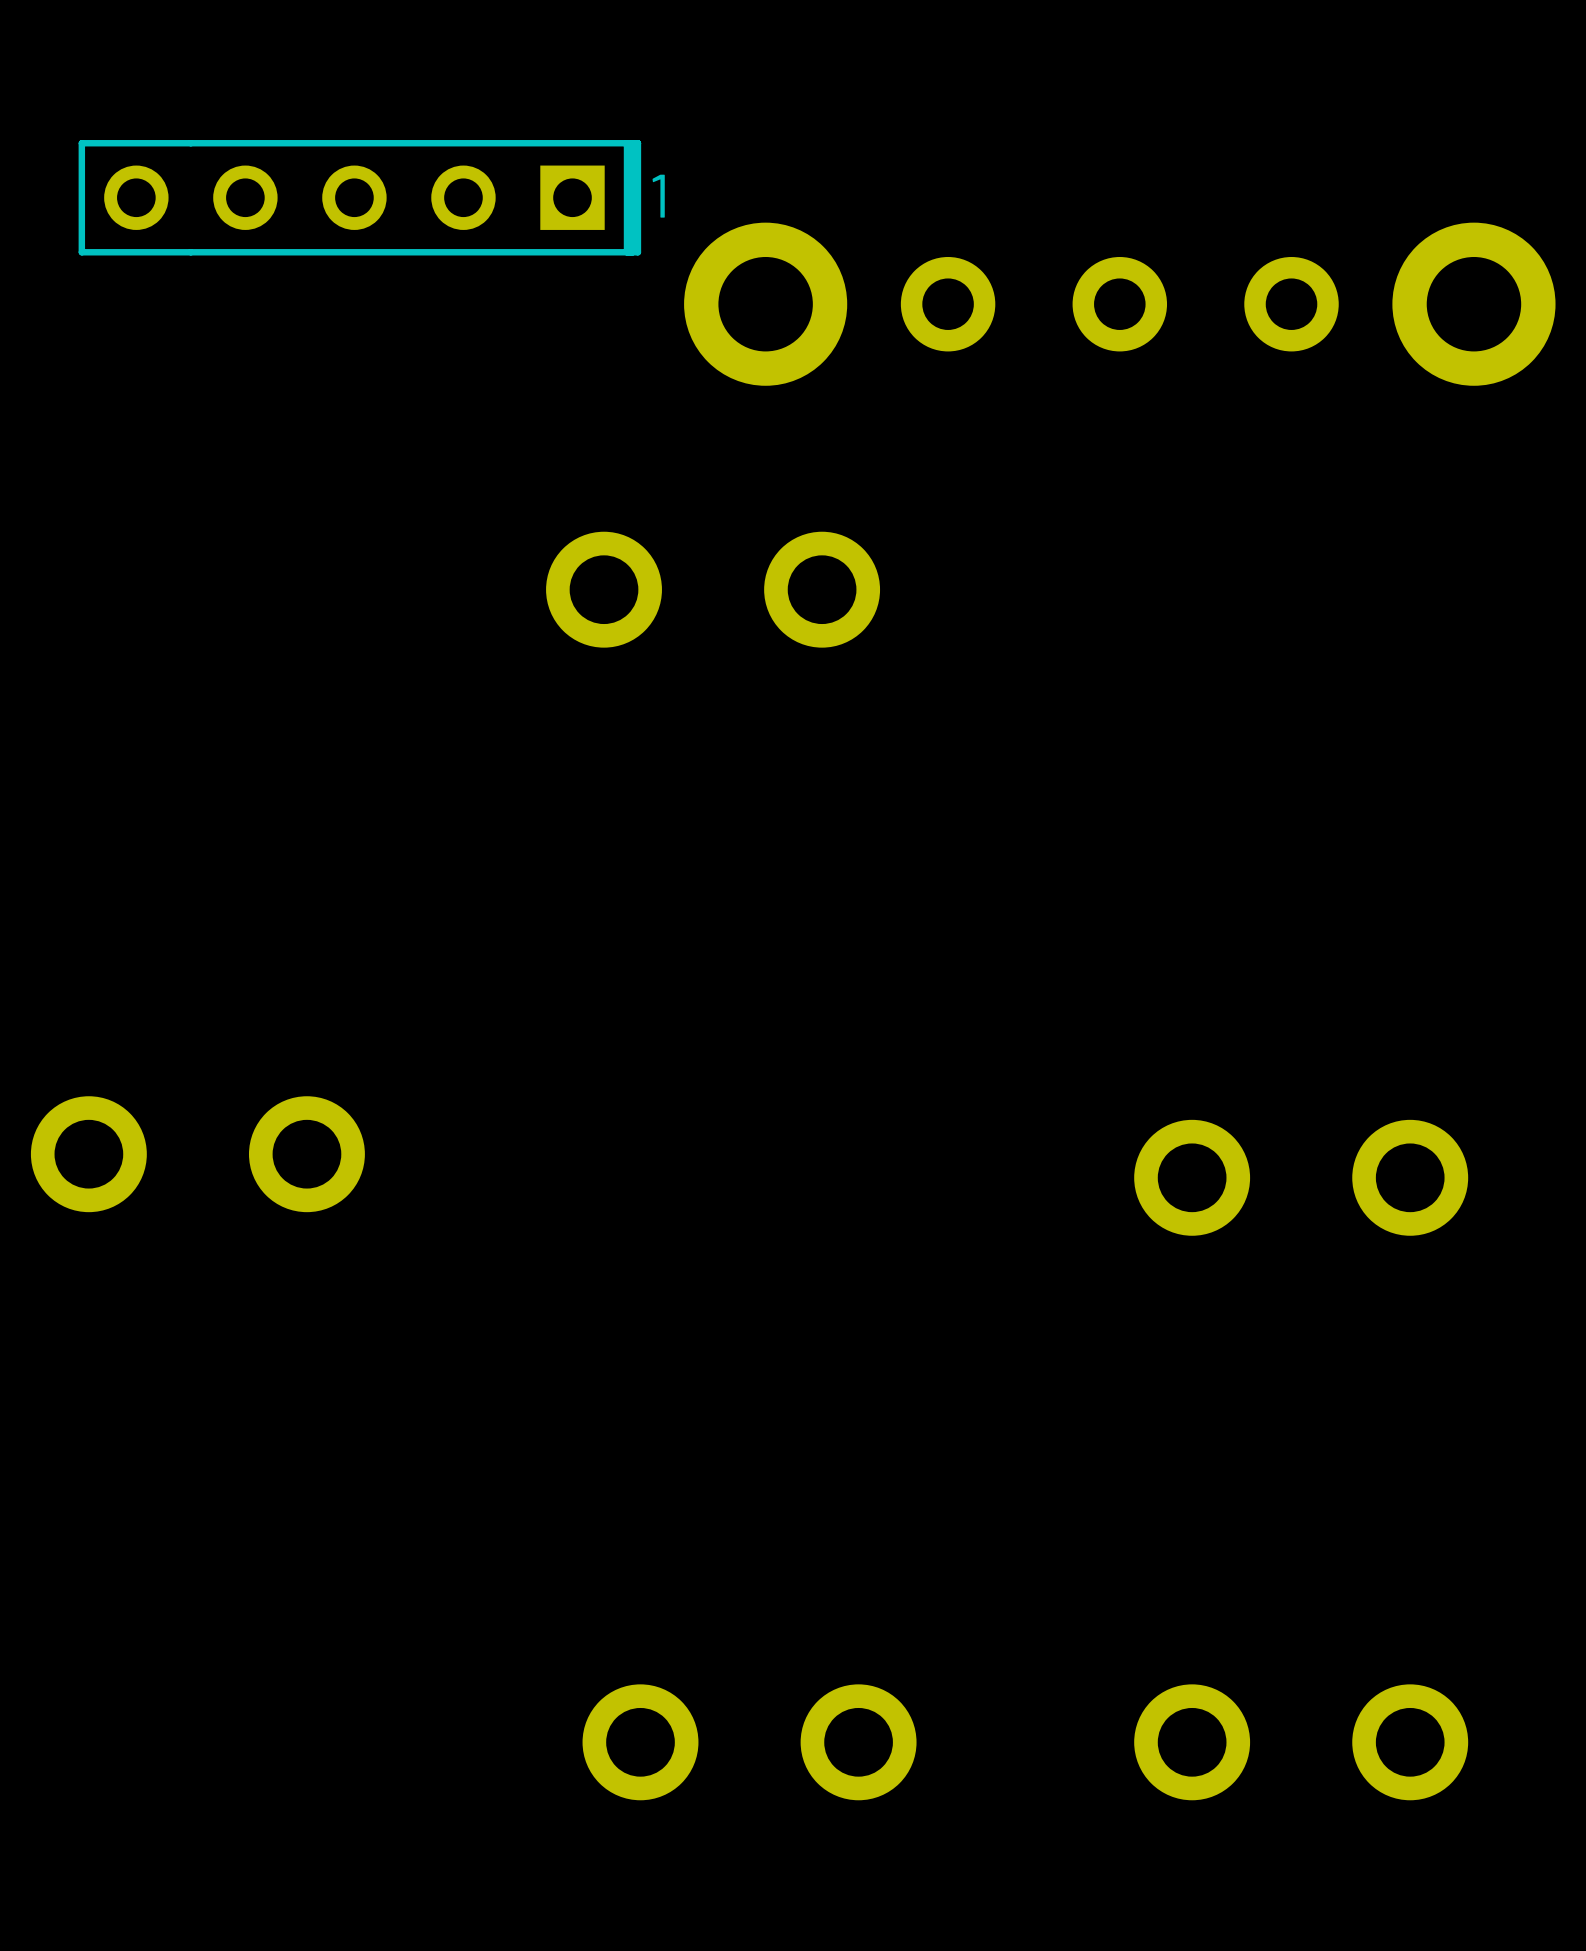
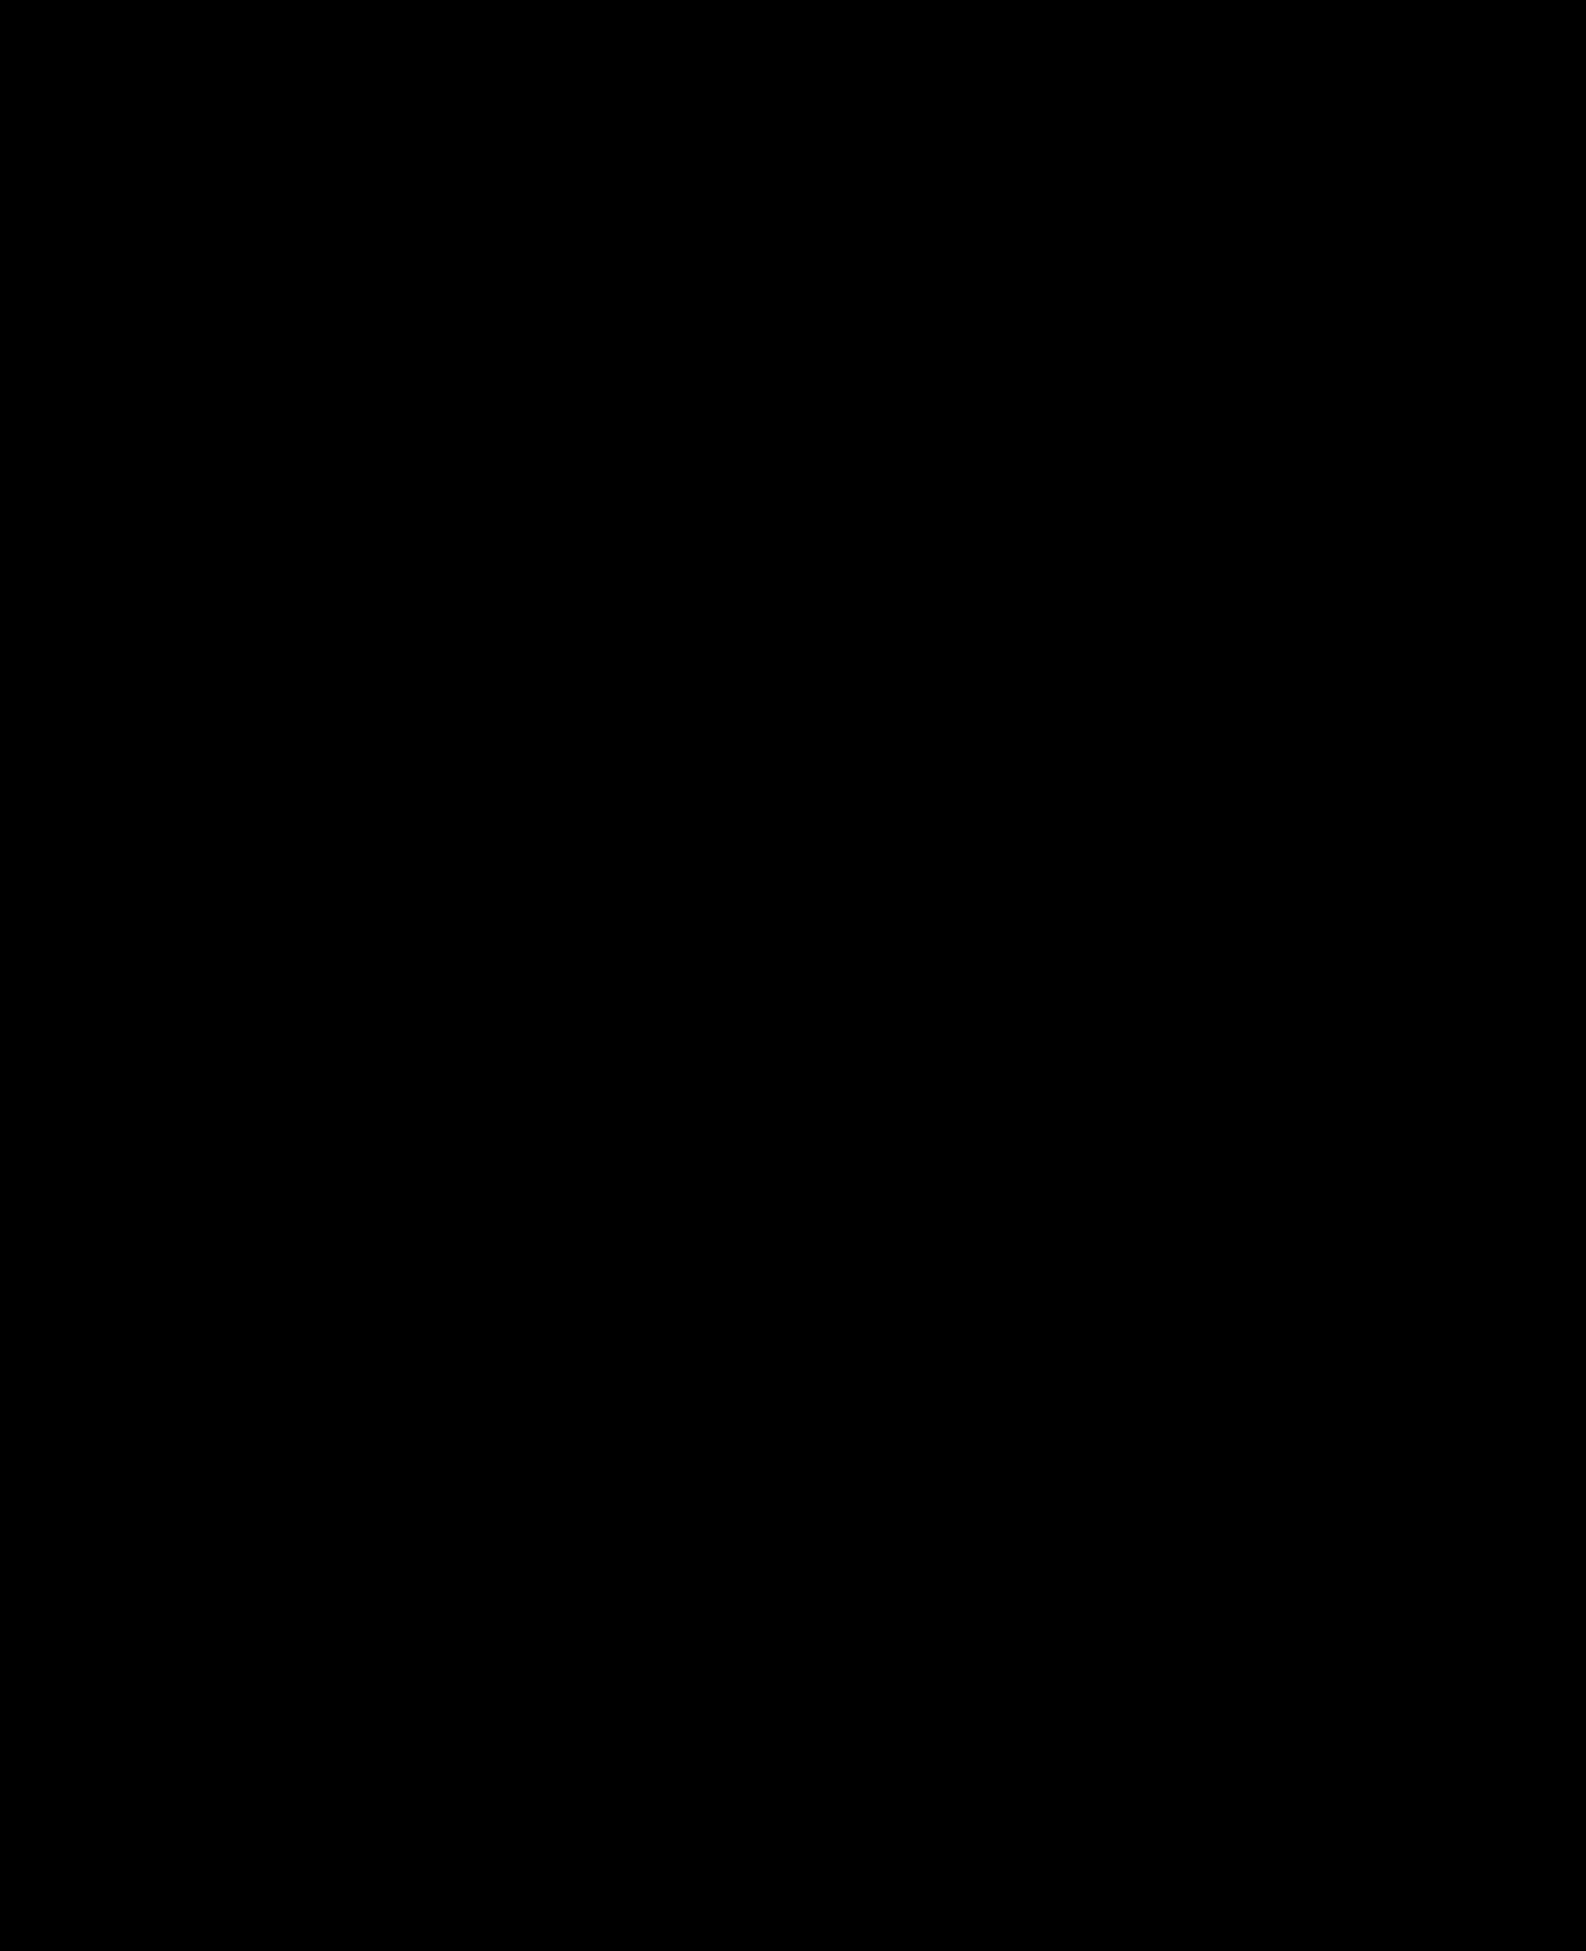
part: (359, 197) -> none
part: (1119, 304) -> none
part: (713, 589) -> none
part: (197, 1154) -> none
part: (1301, 1177) -> none
part: (749, 1742) -> none
part: (1301, 1742) -> none

